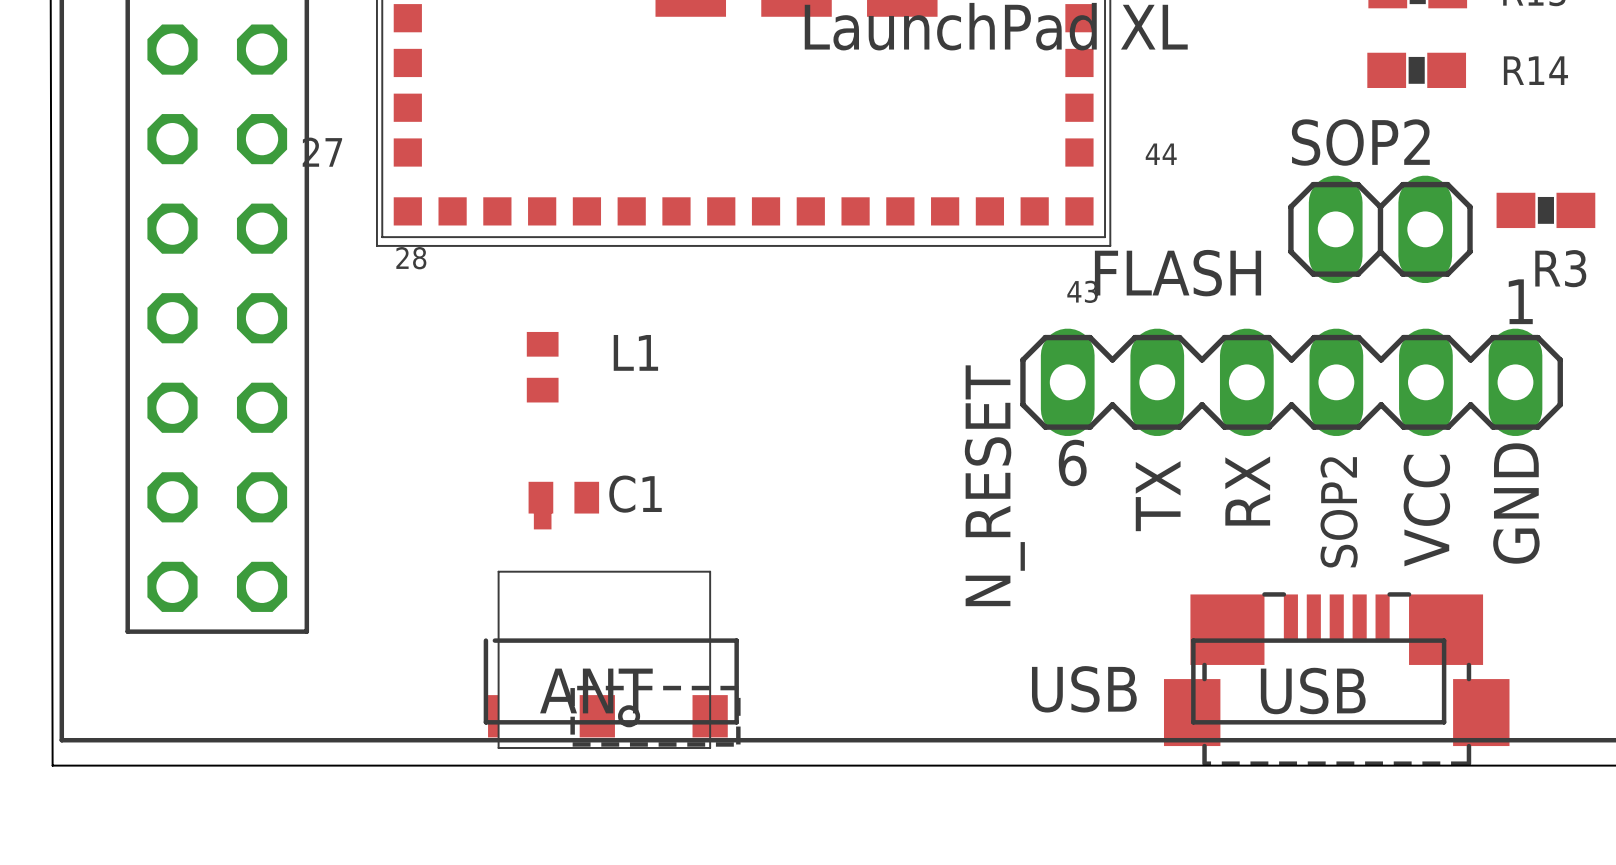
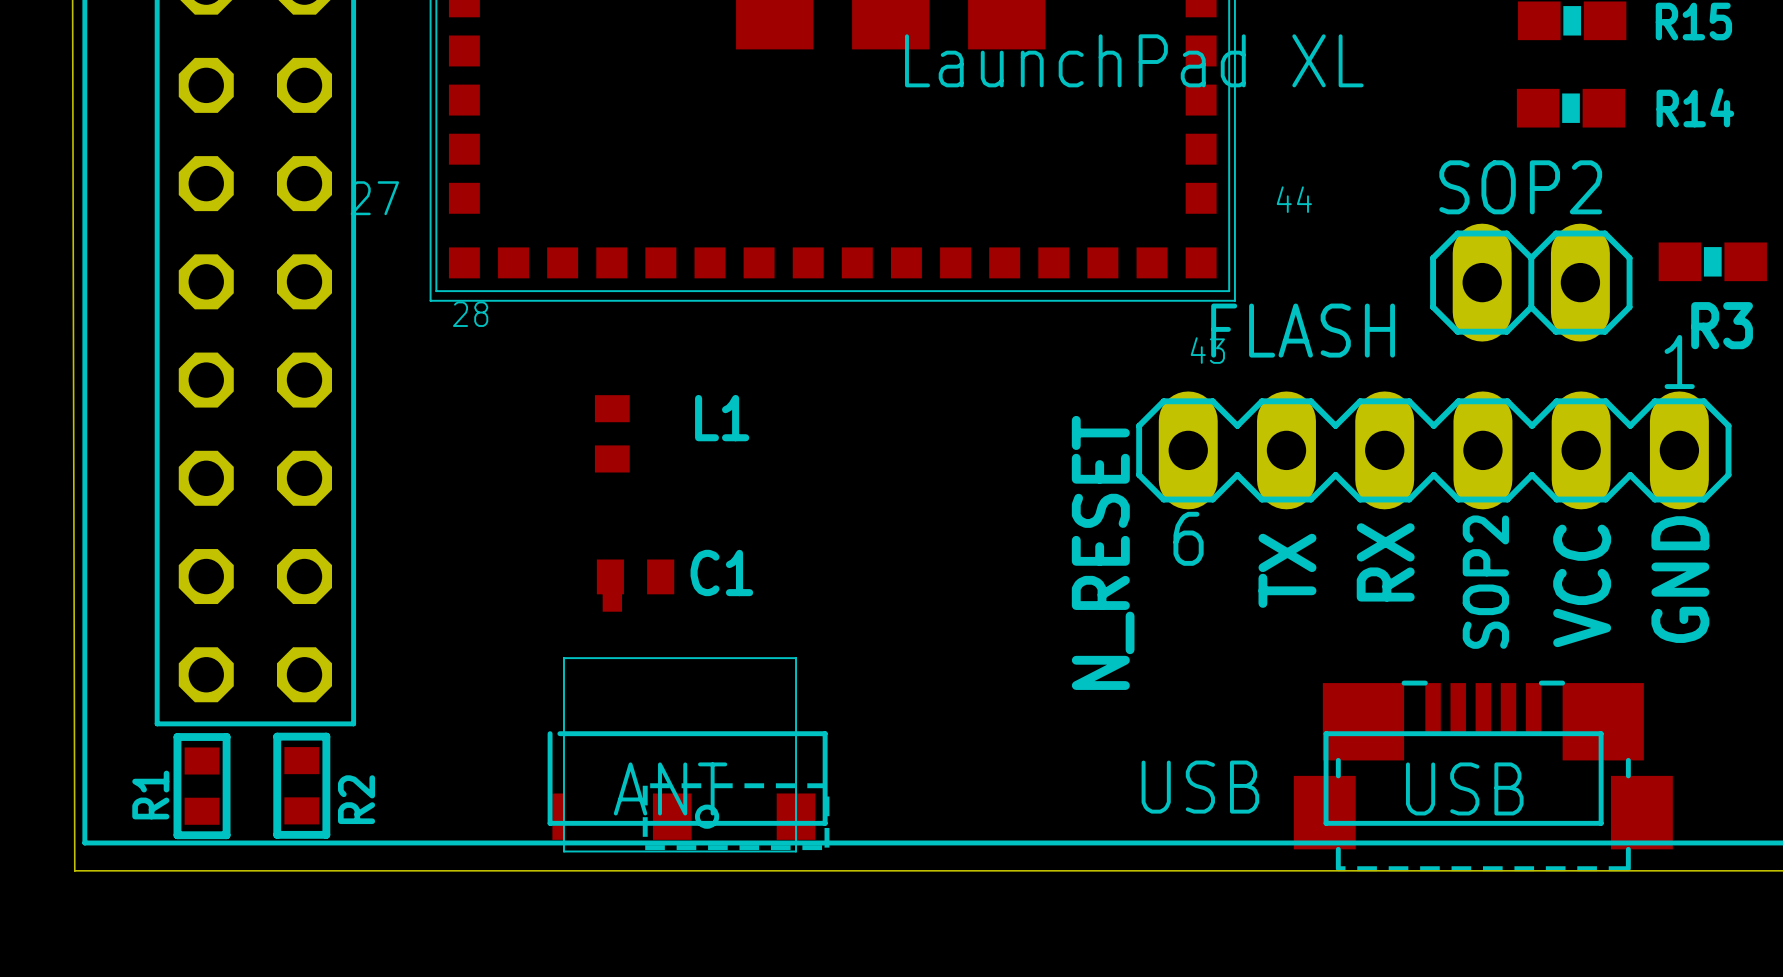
R1: none -> (202, 786)
R2: none -> (301, 785)

